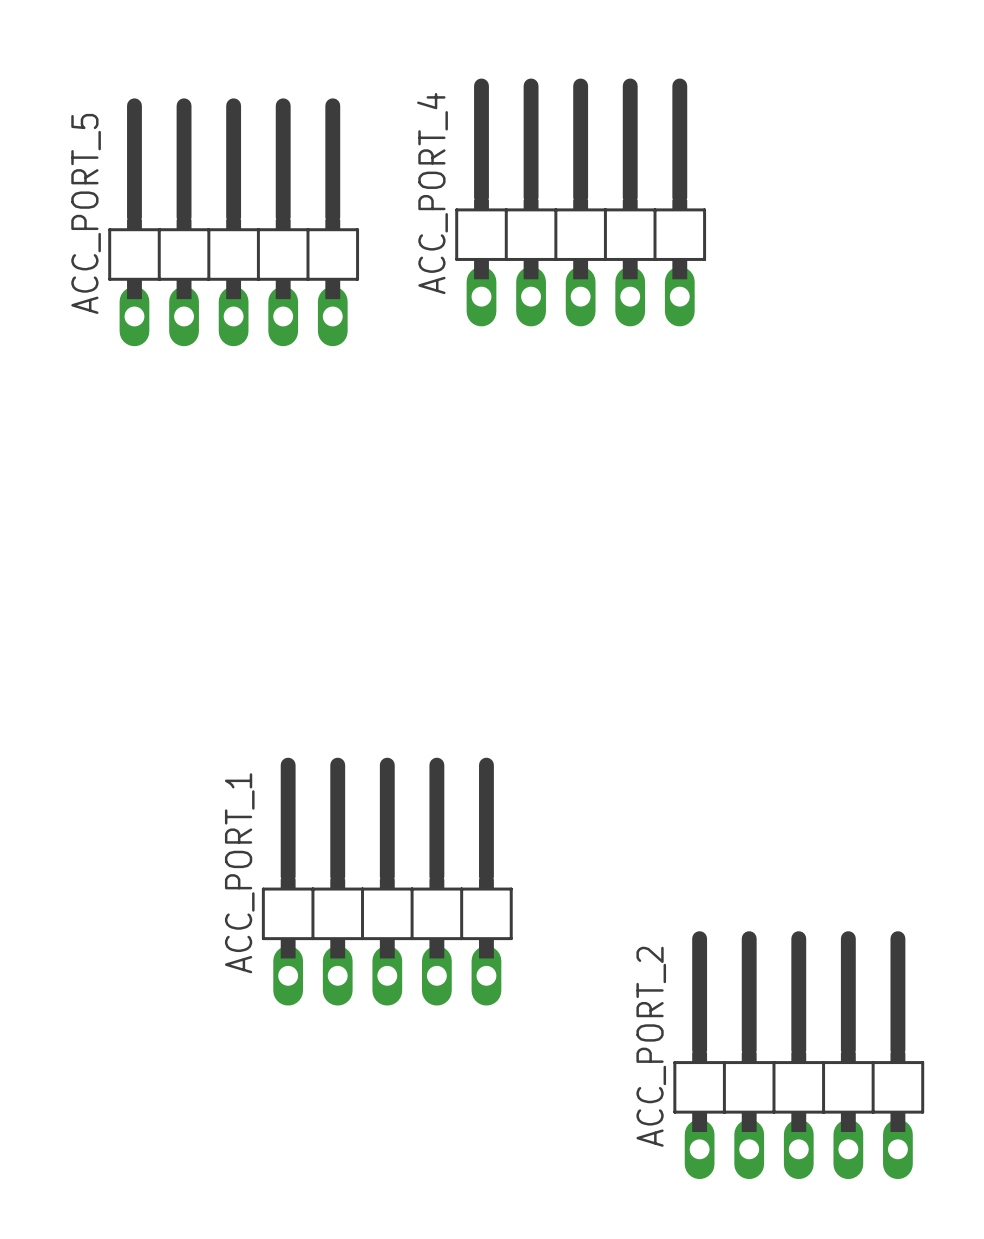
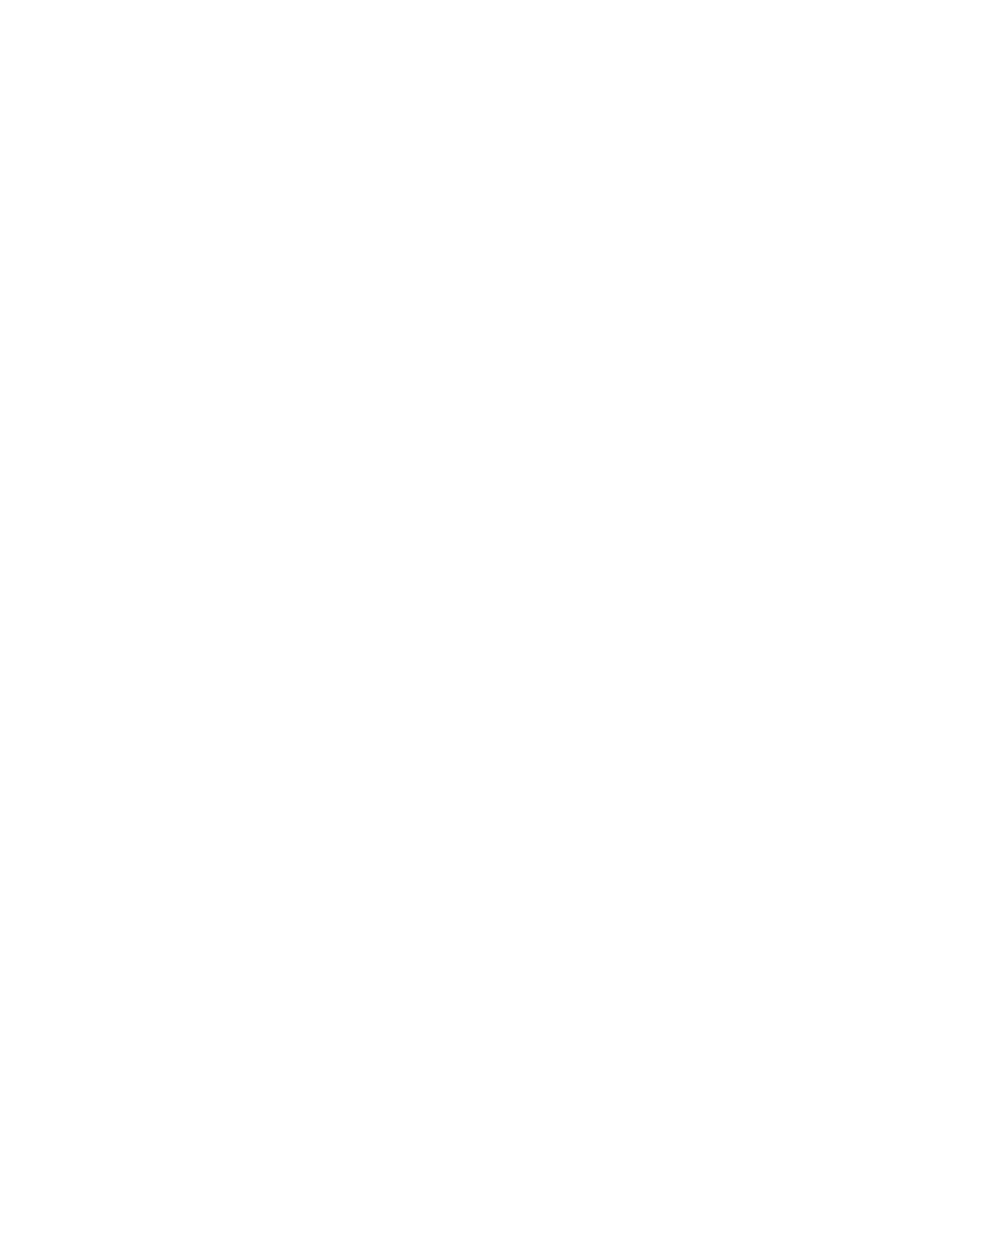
ACC_PORT_4: (580, 202) -> none
ACC_PORT_5: (233, 222) -> none
ACC_PORT_1: (387, 881) -> none
ACC_PORT_2: (798, 1055) -> none

